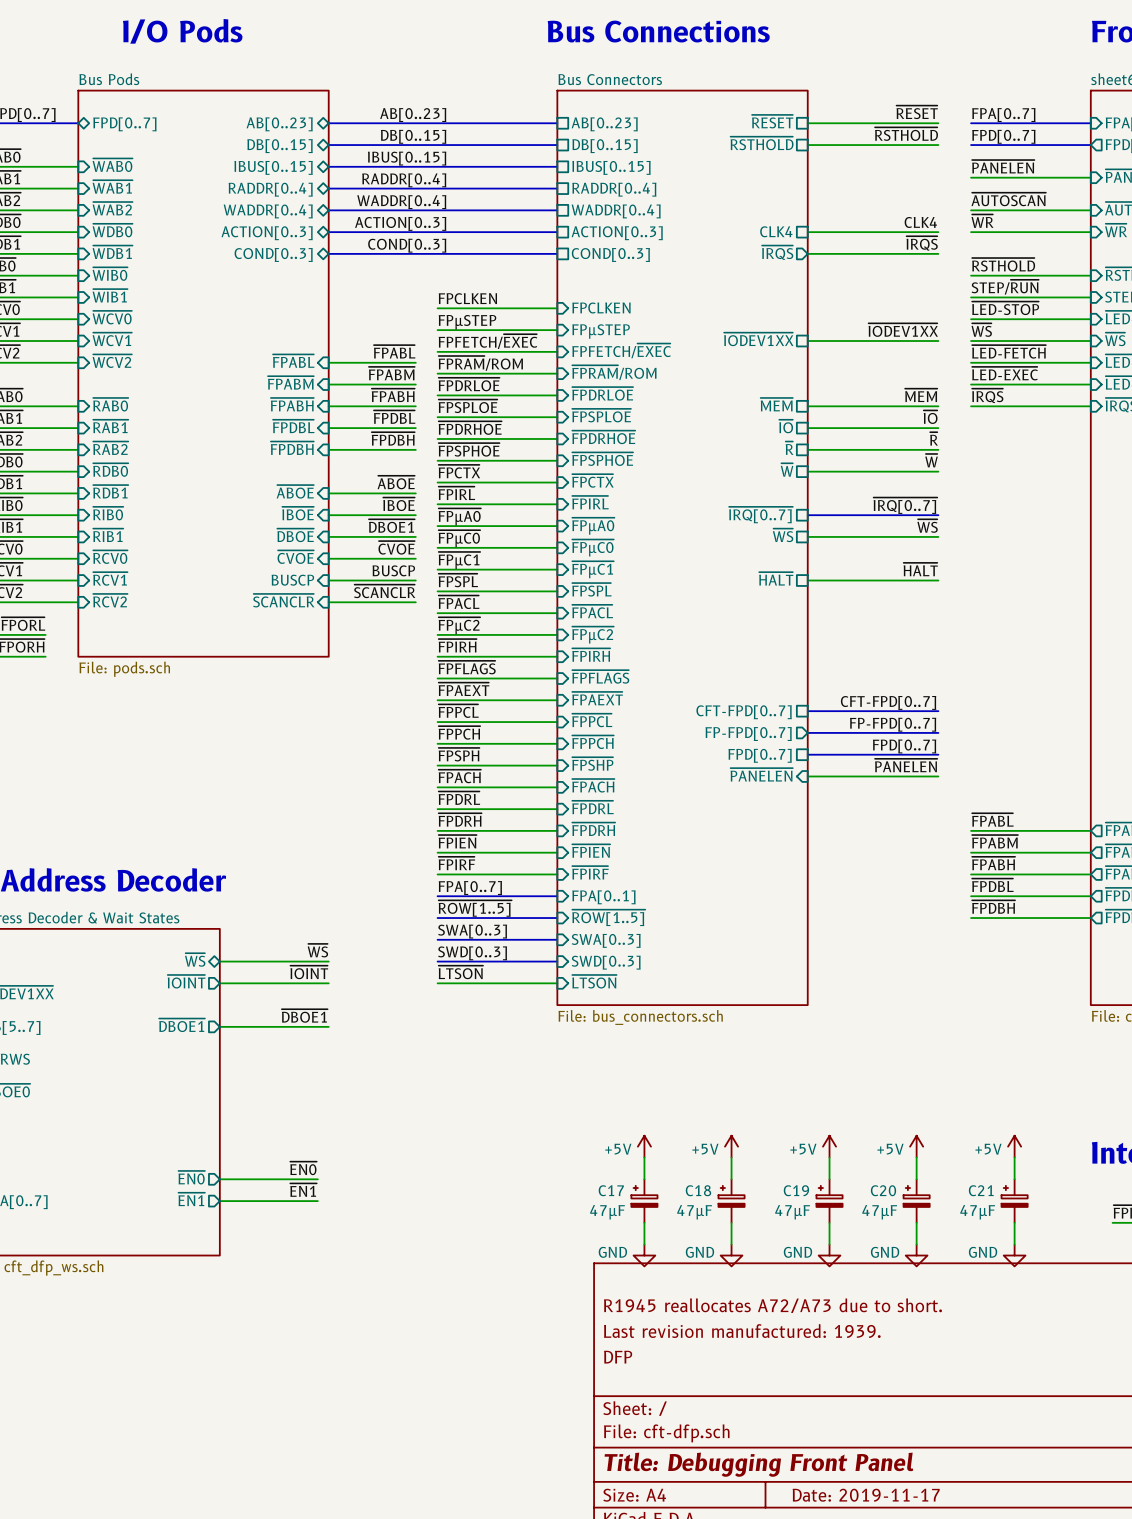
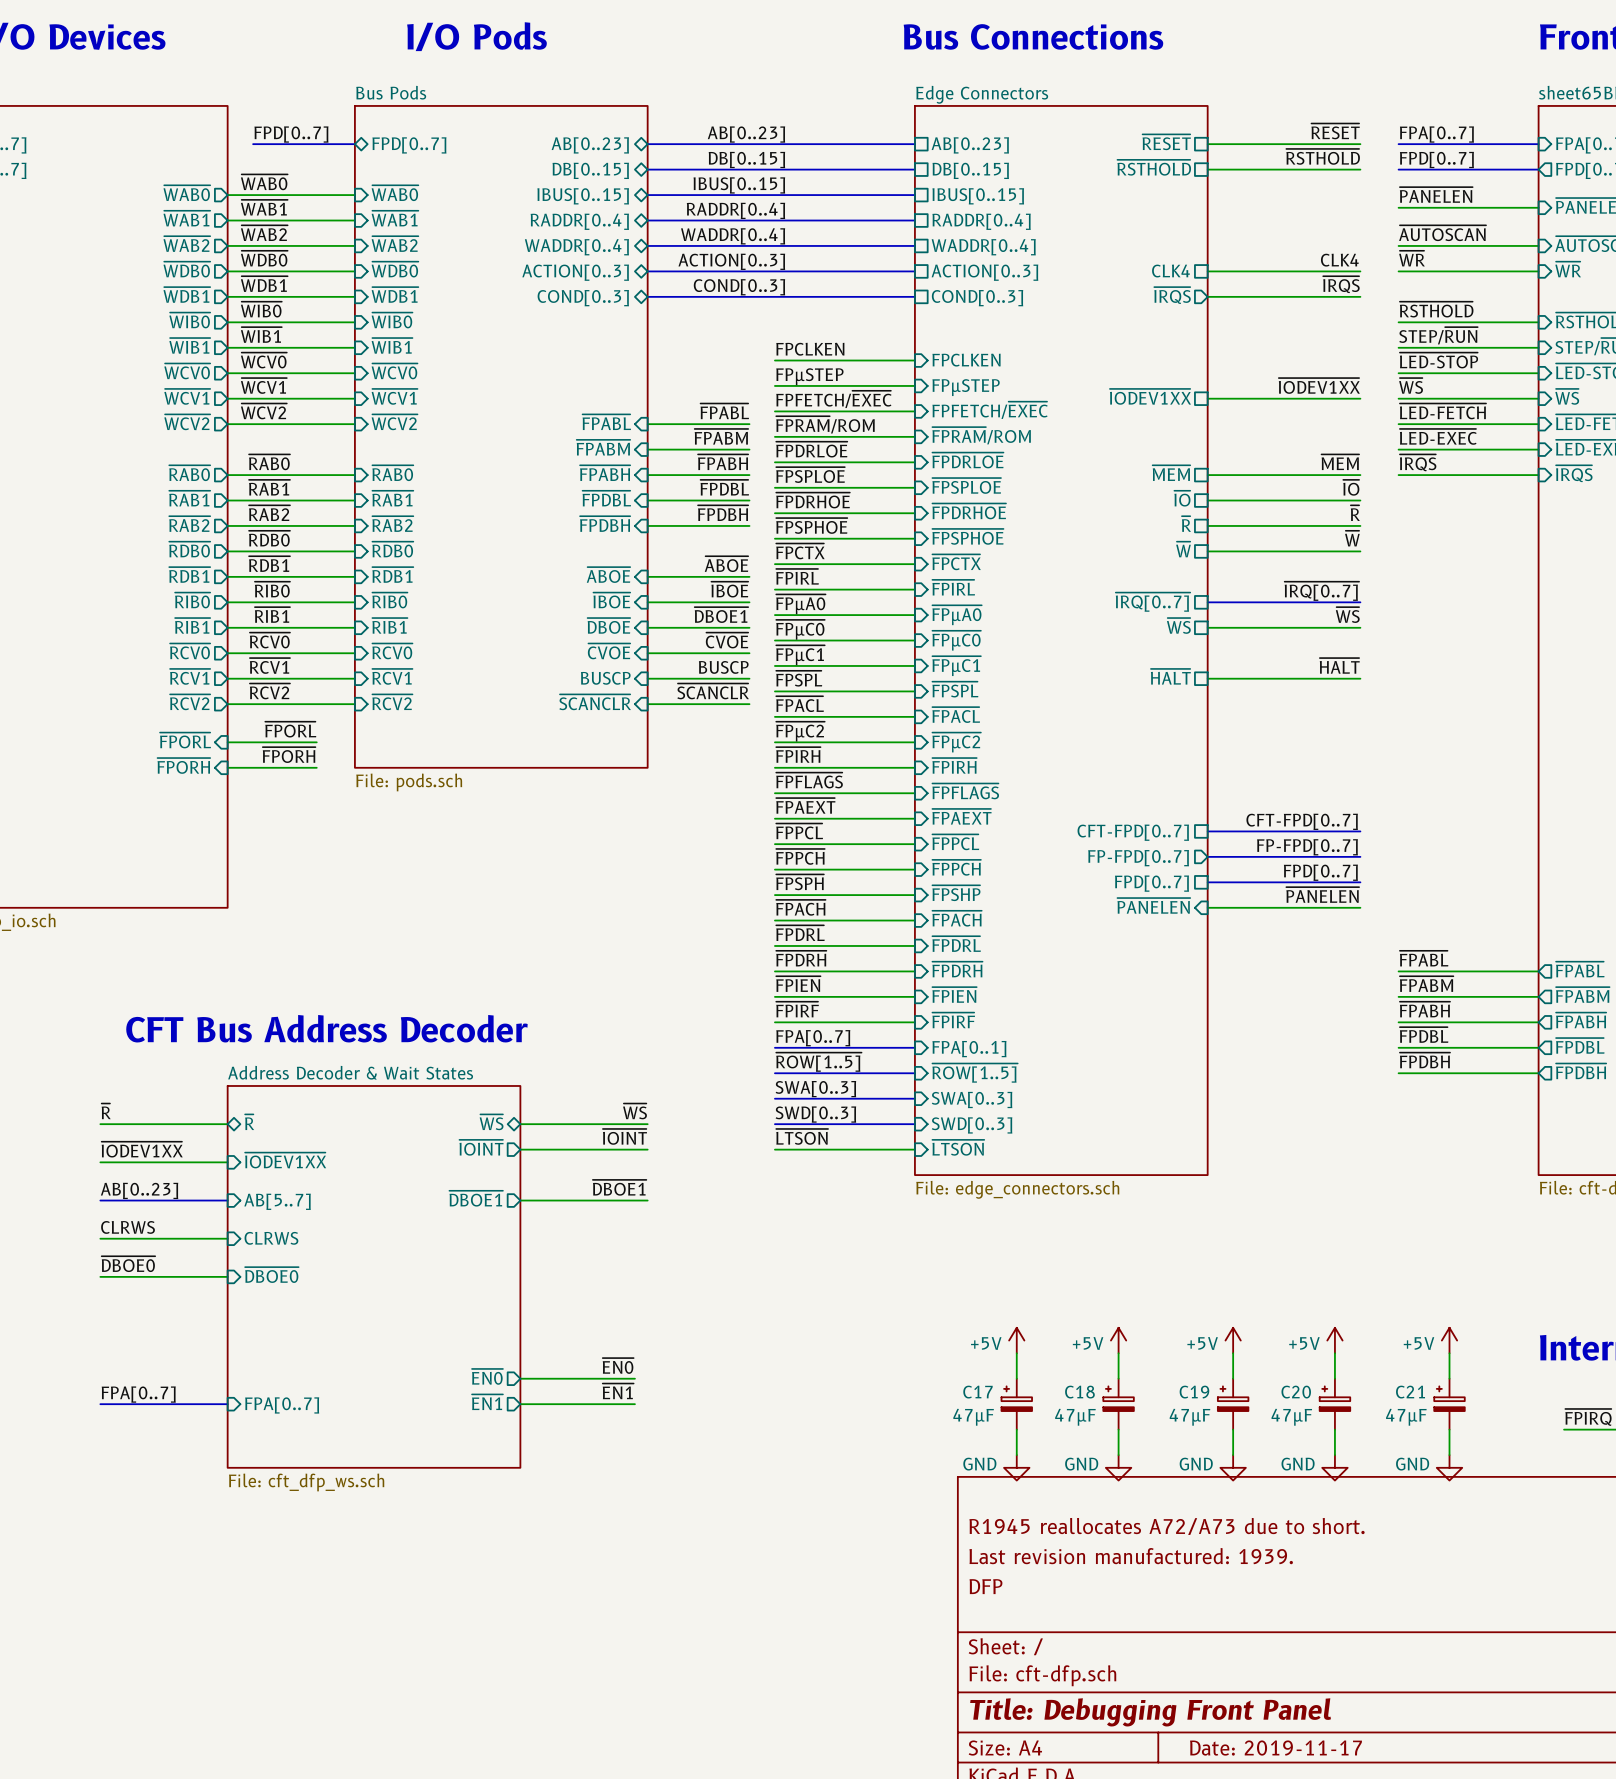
sheet Bus Connectors name: Bus Connectors (610, 79) -> Edge Connectors (982, 94)
sheet Bus Connectors value: File: bus_connectors.sch (640, 1017) -> File: edge_connectors.sch (1017, 1189)

